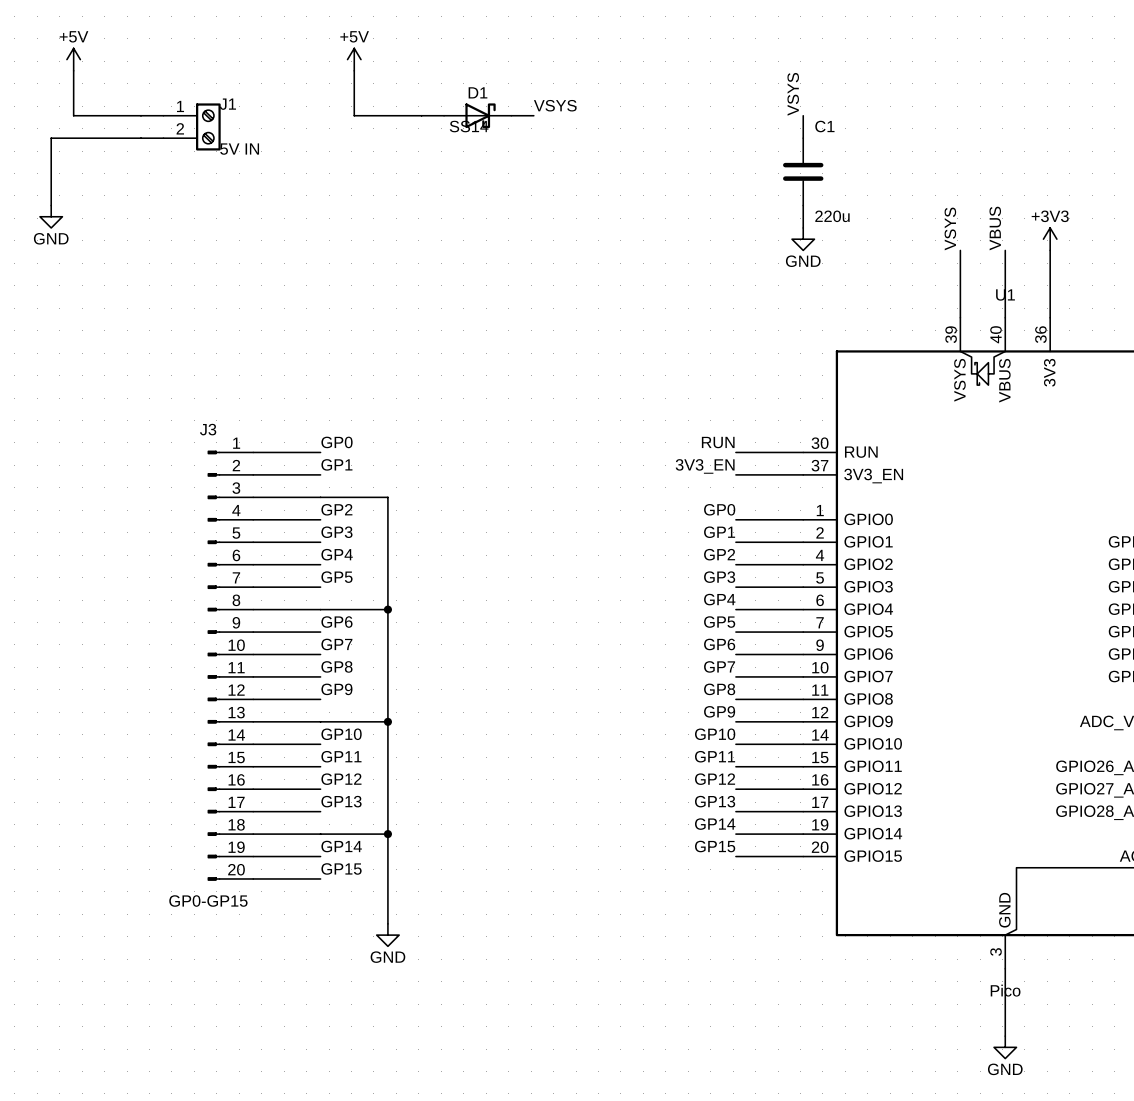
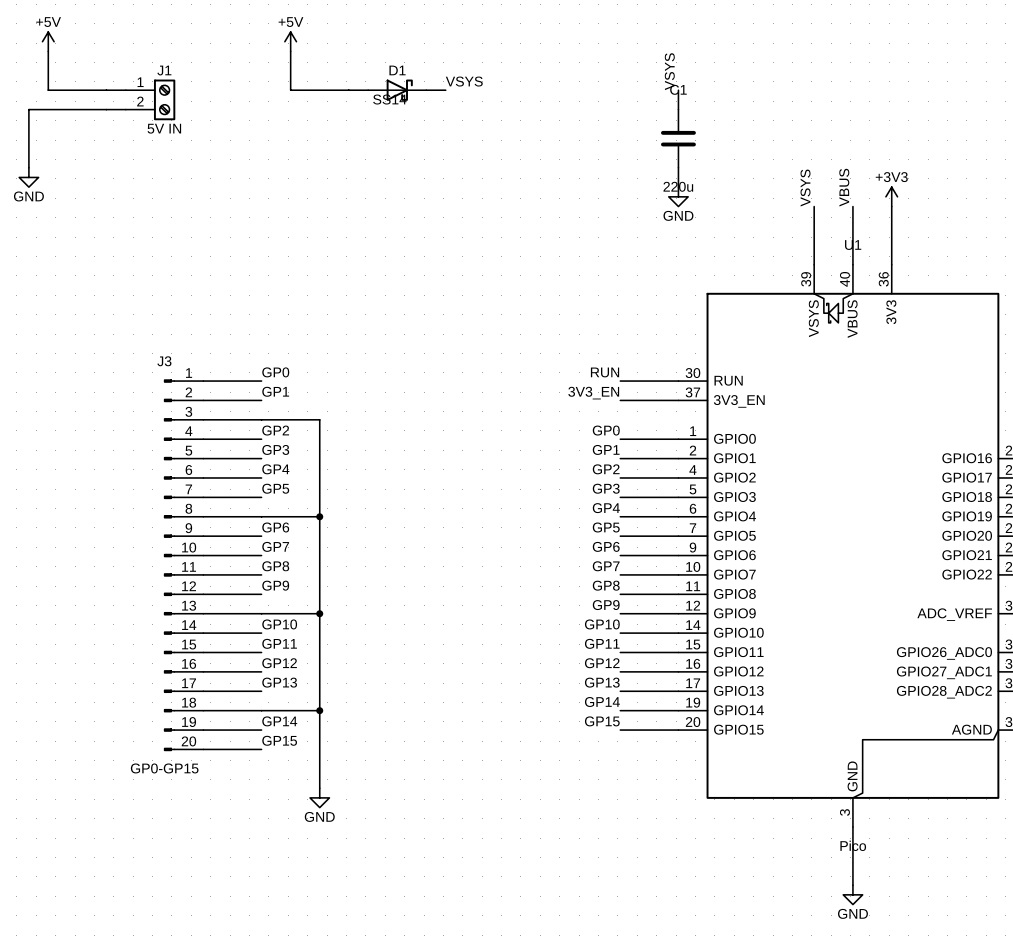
J1 name position: J1 (227, 104) -> J1 (164, 70)
C1 name position: C1 (824, 126) -> C1 (678, 89)
J1 value position: 5V IN (239, 149) -> 5V IN (164, 128)
C1 value position: 220u (832, 216) -> 220u (678, 186)

